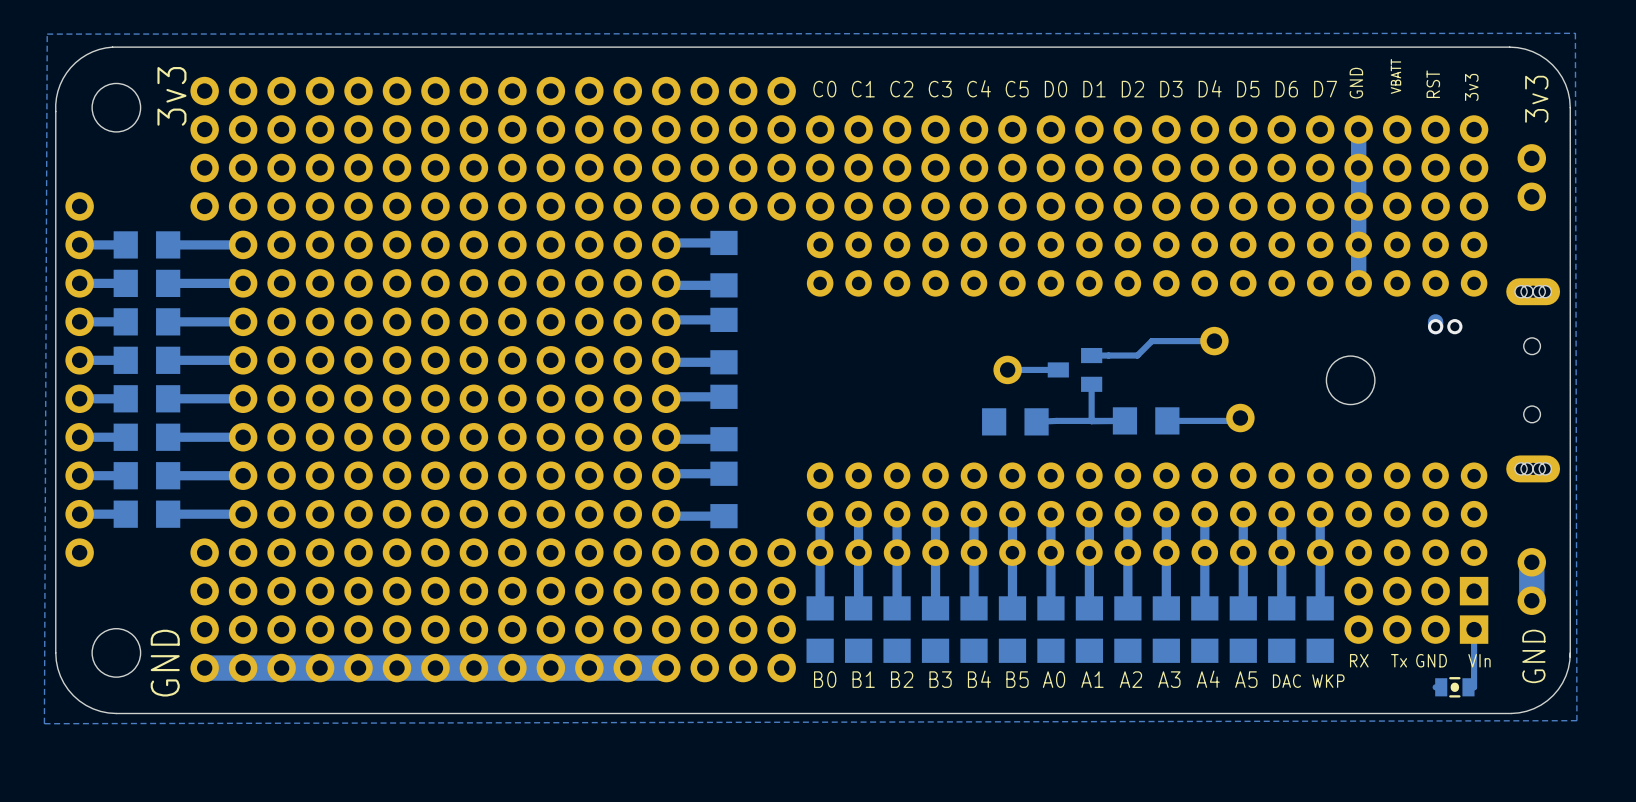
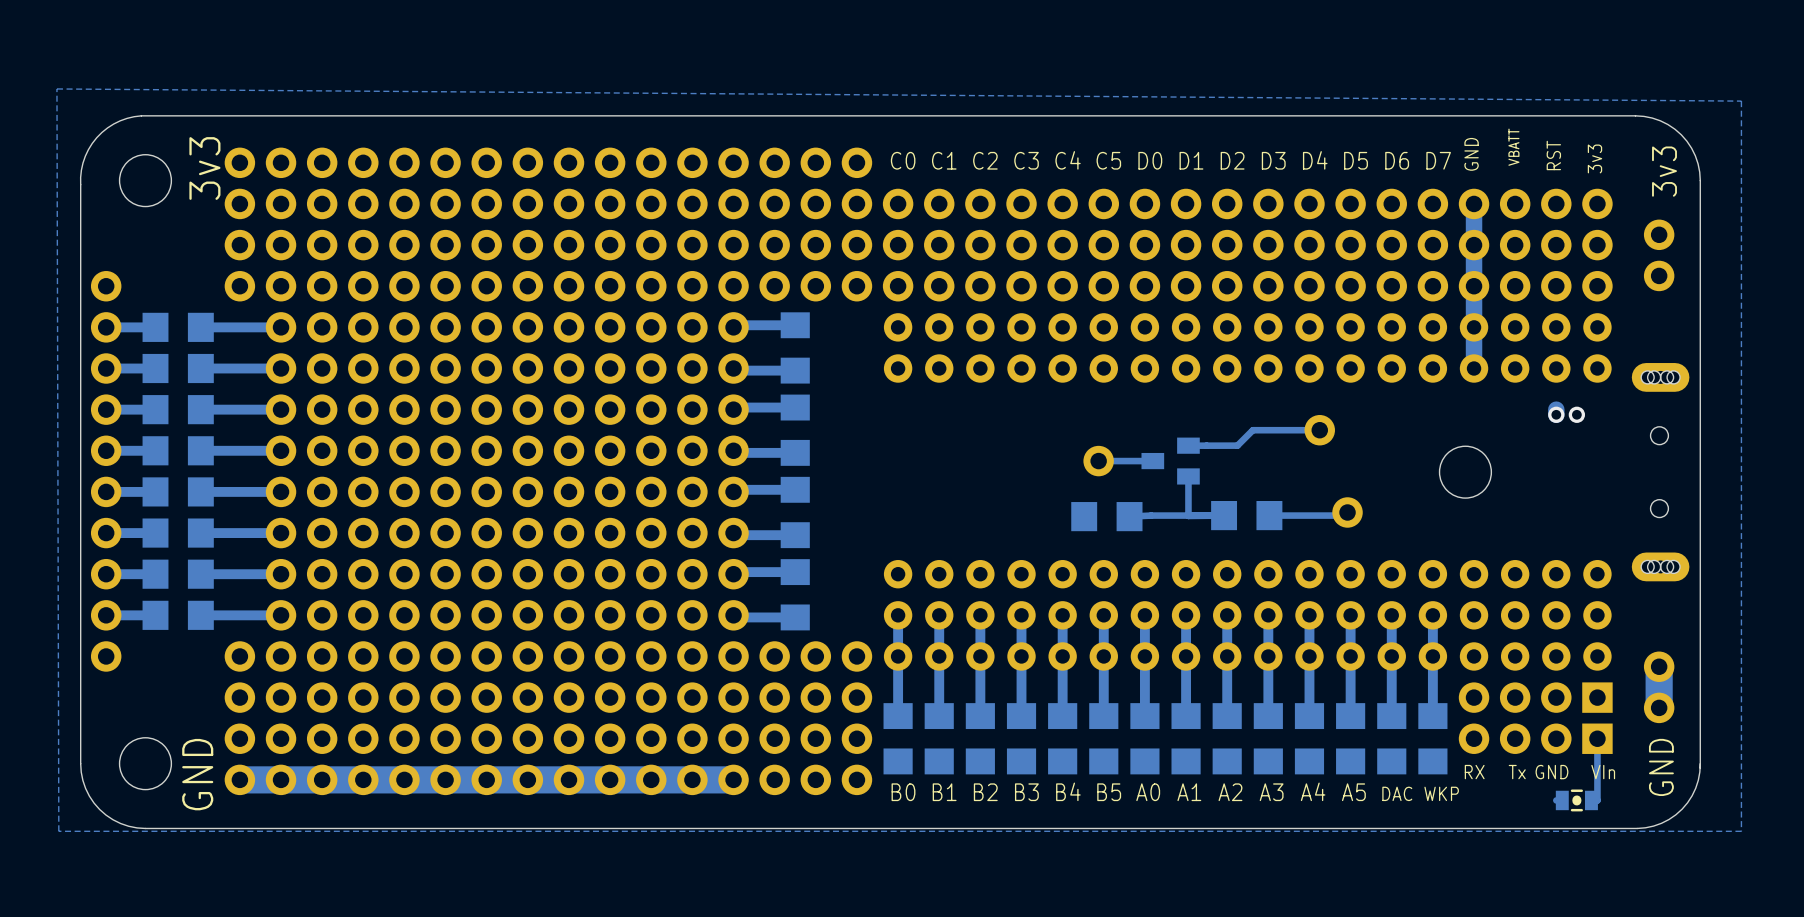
zone outline: (1575, 33) (47, 34) (44, 723) (1576, 720) (1575, 33) -> (56, 88) (1741, 101) (1741, 831) (58, 831) (56, 88)

